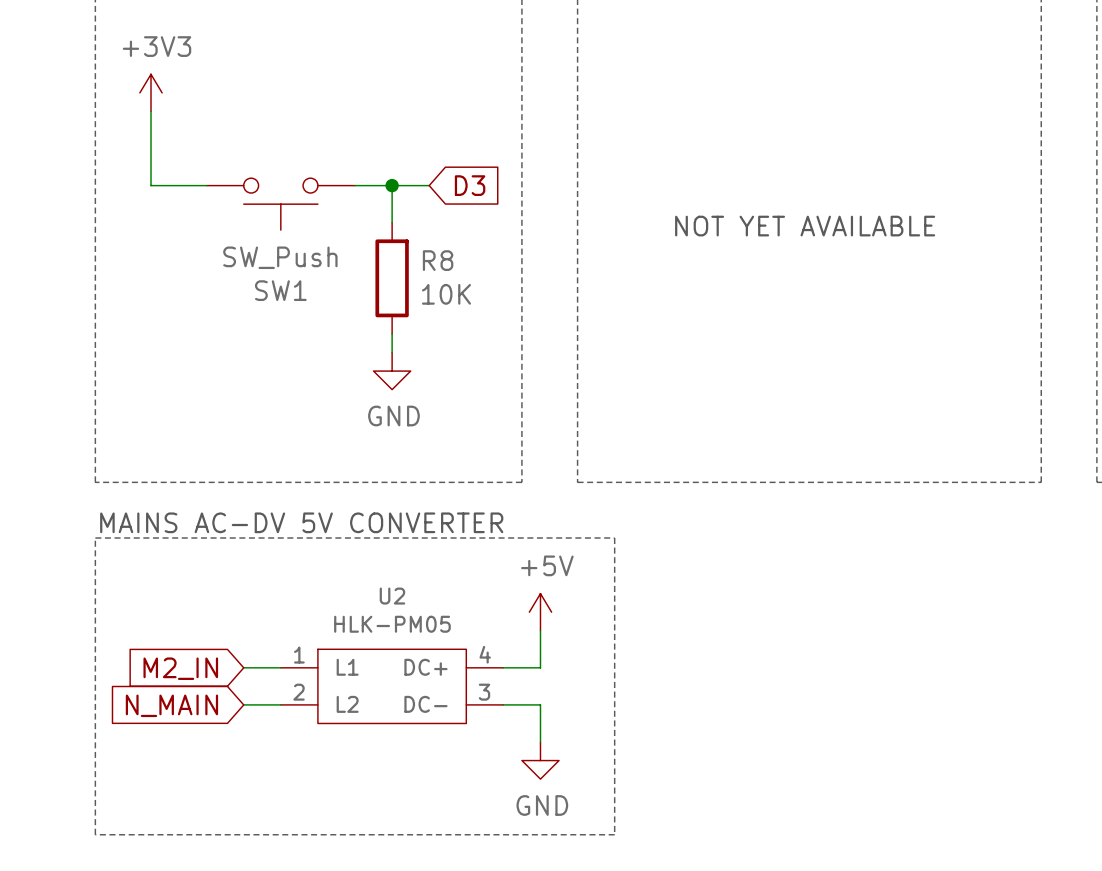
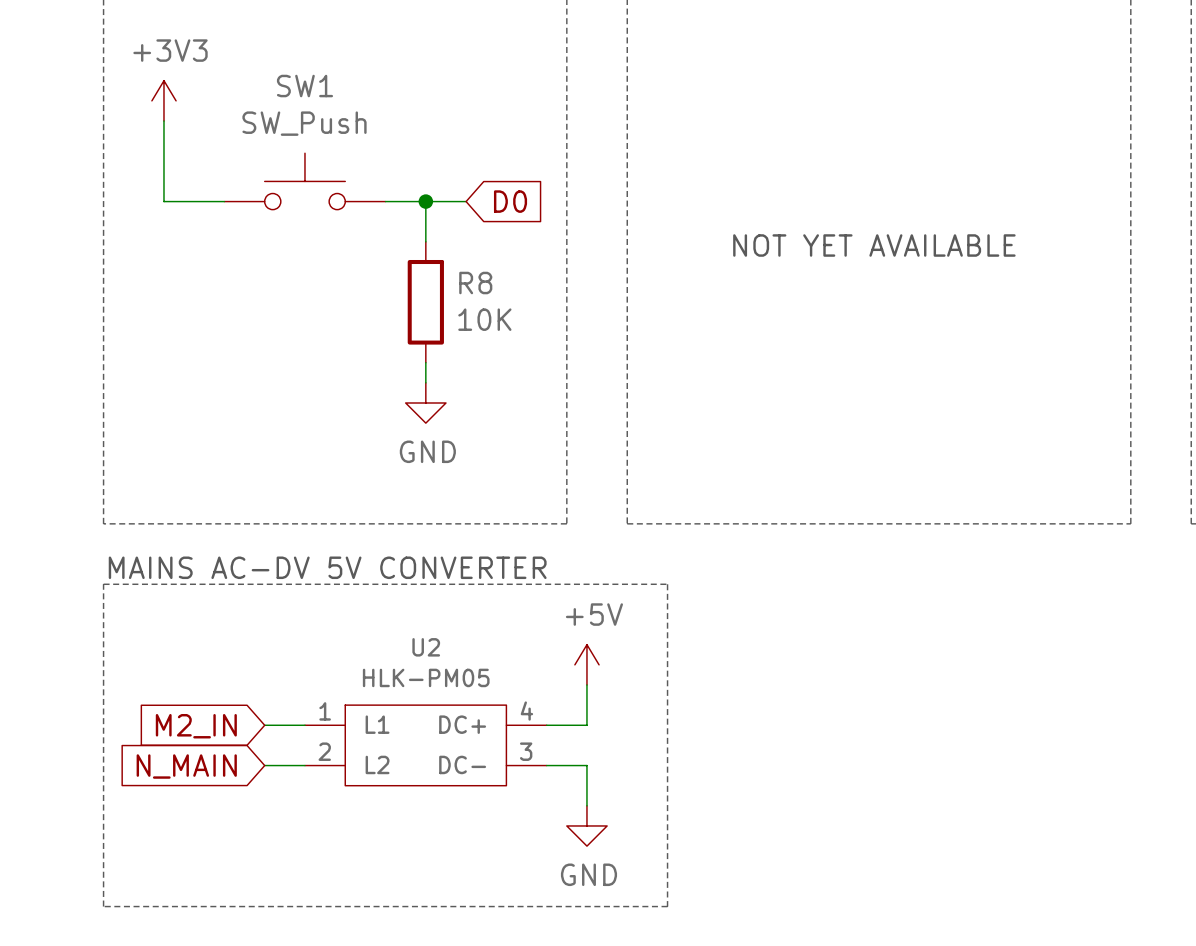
global label: D3 (470, 185) -> D0 (510, 201)
SW1 rotation: 0° (280, 204) -> 180° (304, 181)

